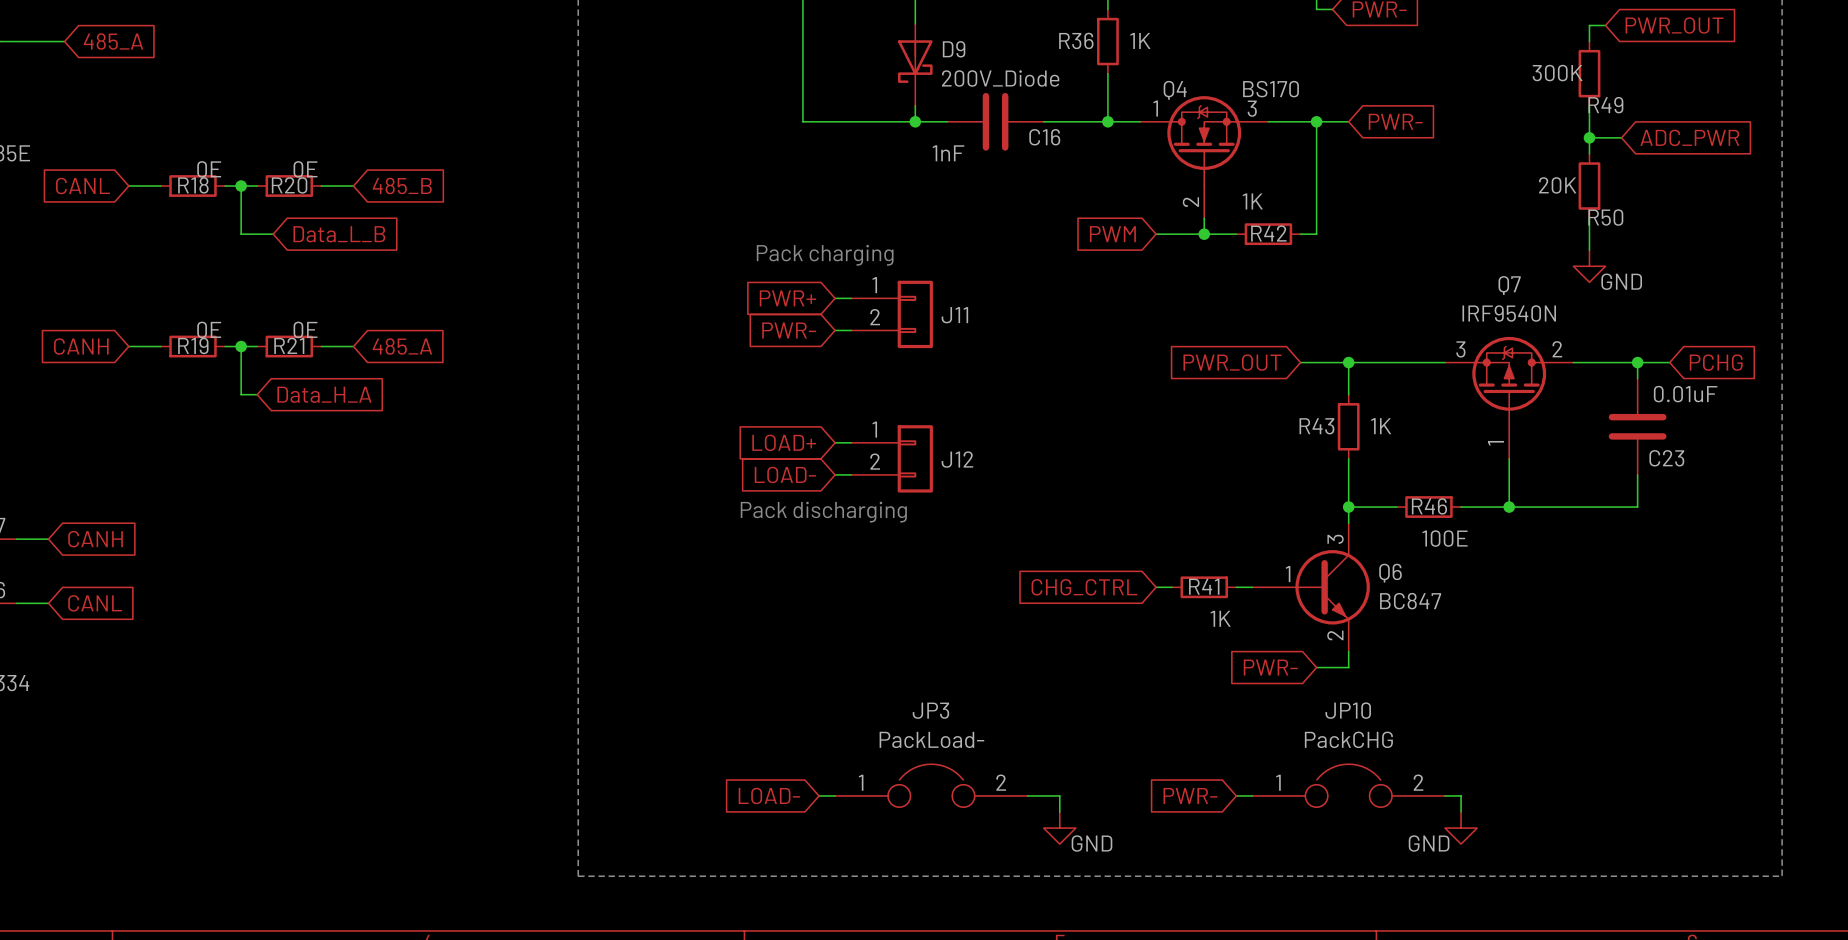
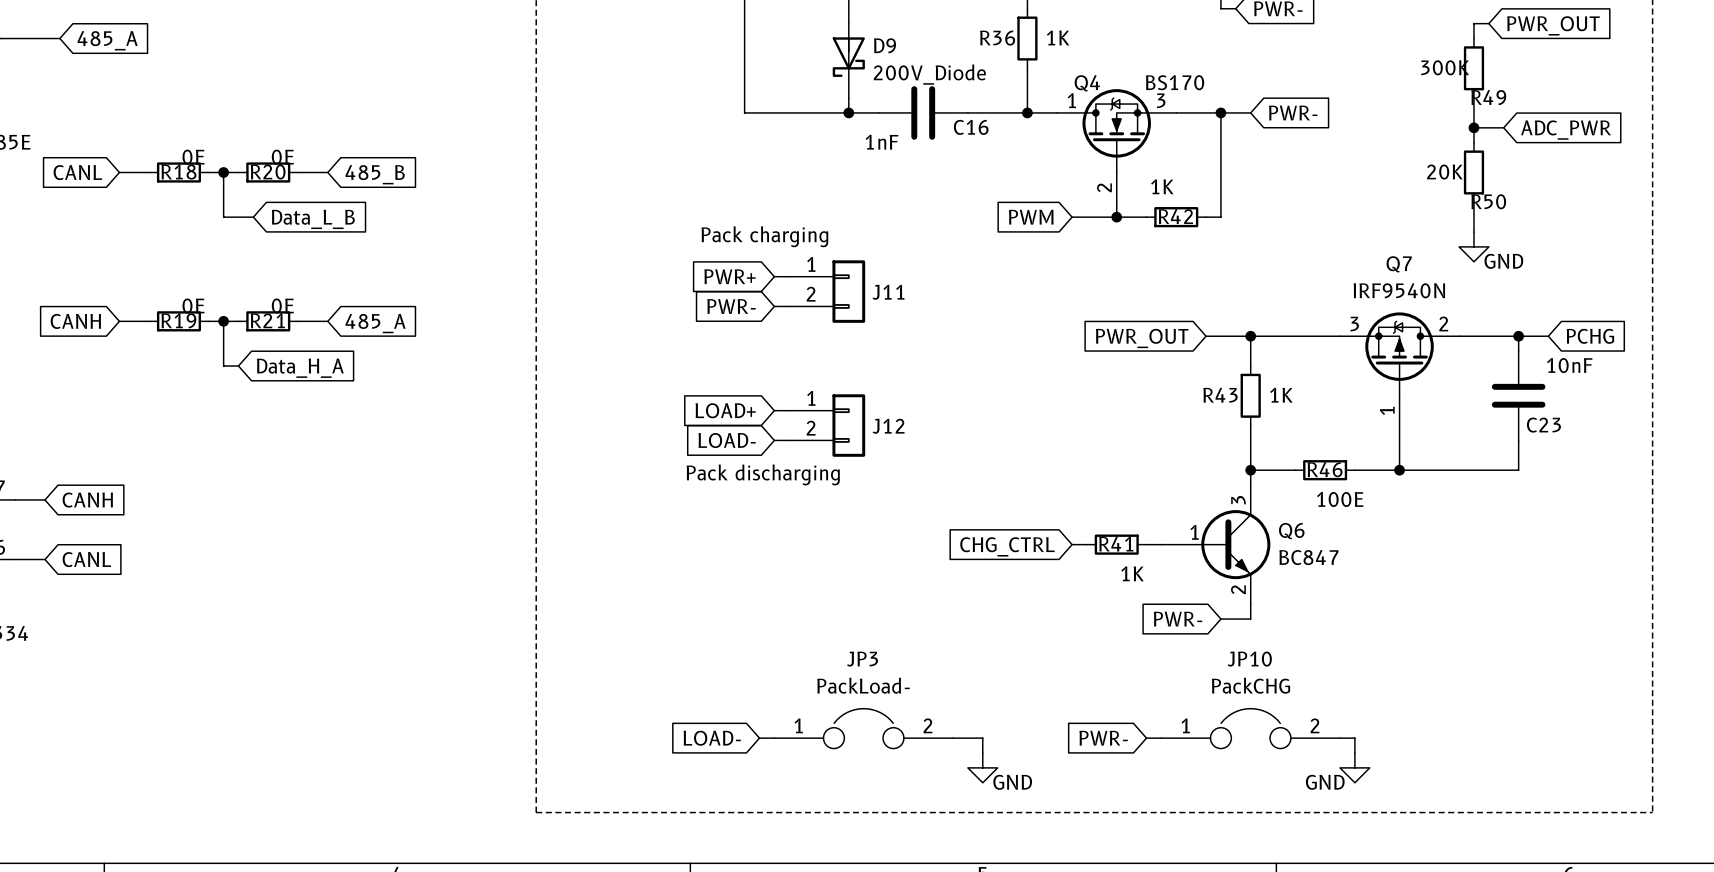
C23 value: 0.01uF (1685, 394) -> 10nF (1569, 365)

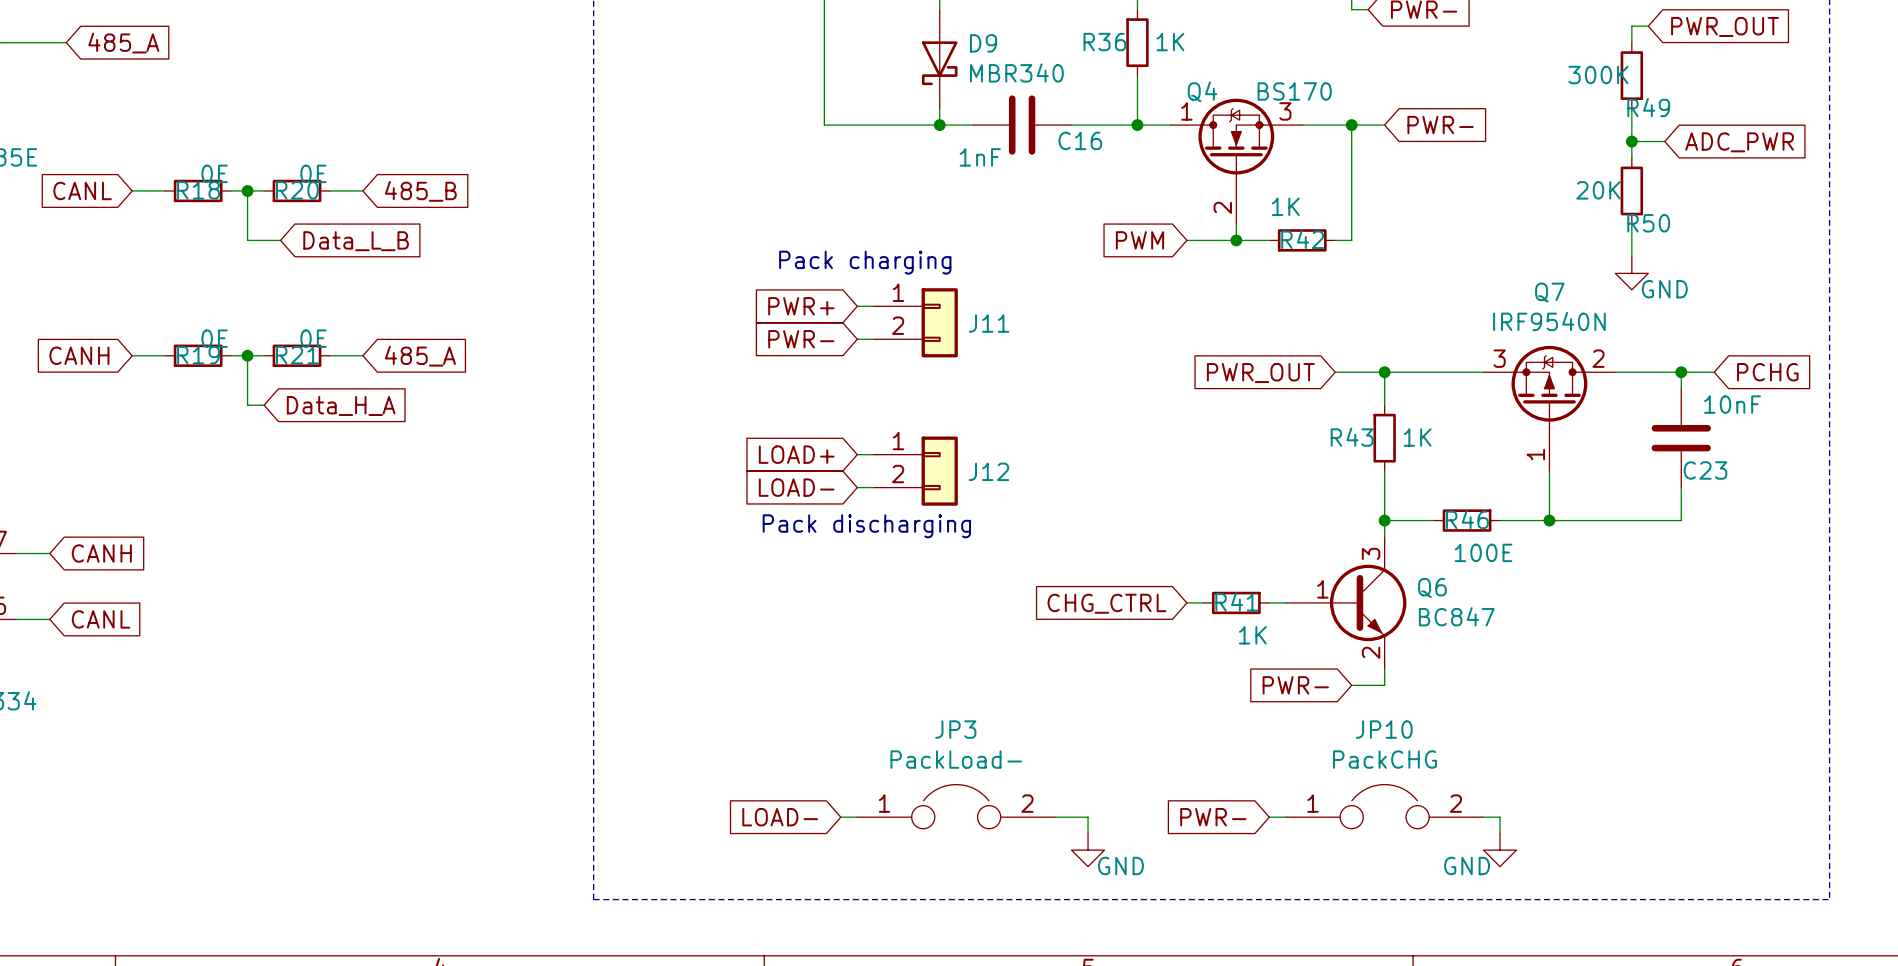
D9 symbol: [832, 22, 865, 99] -> [921, 9, 958, 109]
D9 value: 200V_Diode (929, 74) -> MBR340 (1016, 72)

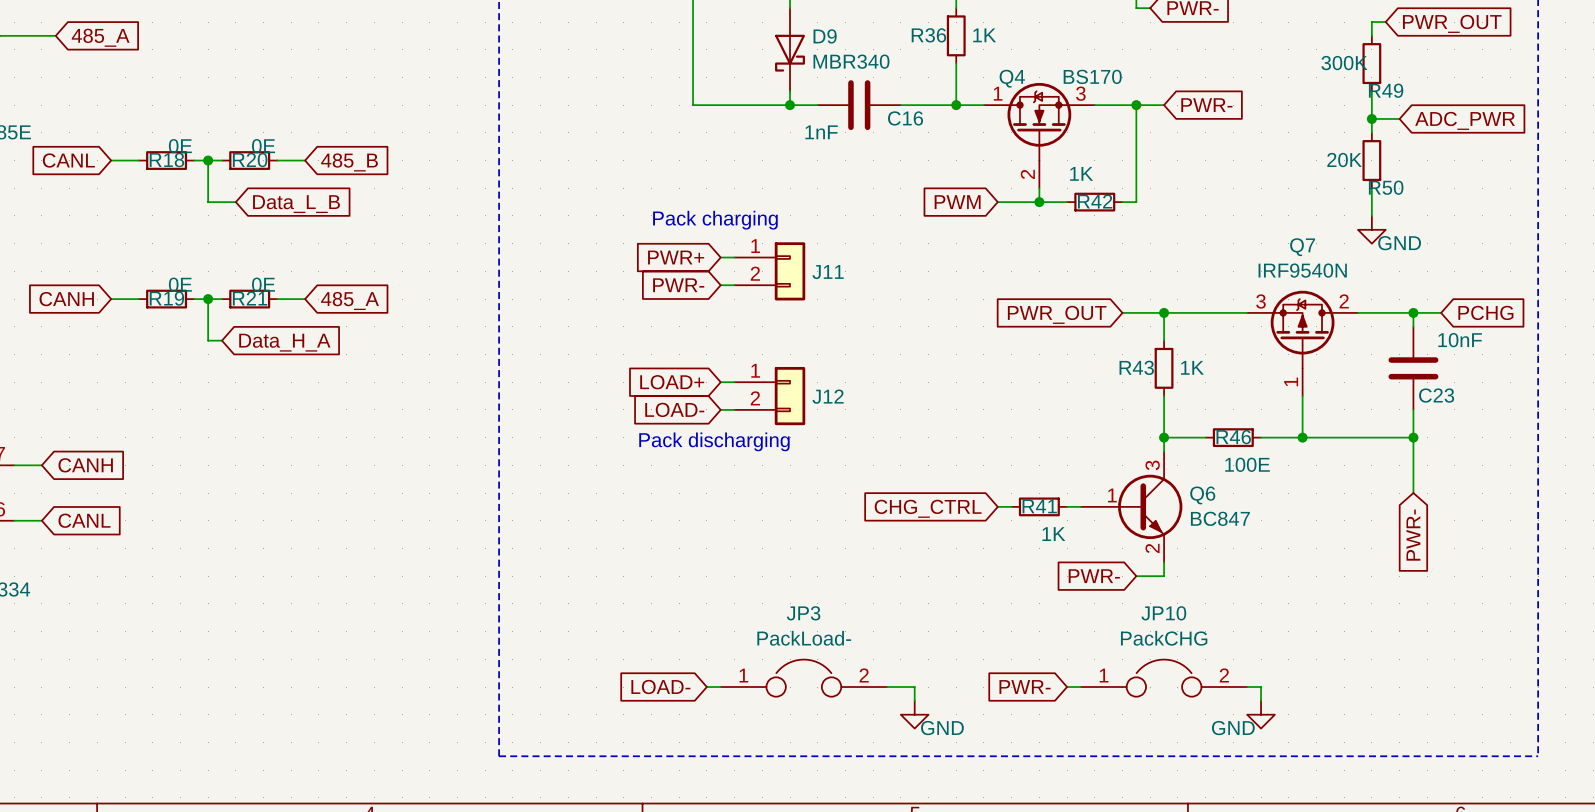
wire: none -> (1413, 437) (1413, 493)
junction: none -> (1413, 437)
global label: none -> PWR- (1413, 535)

